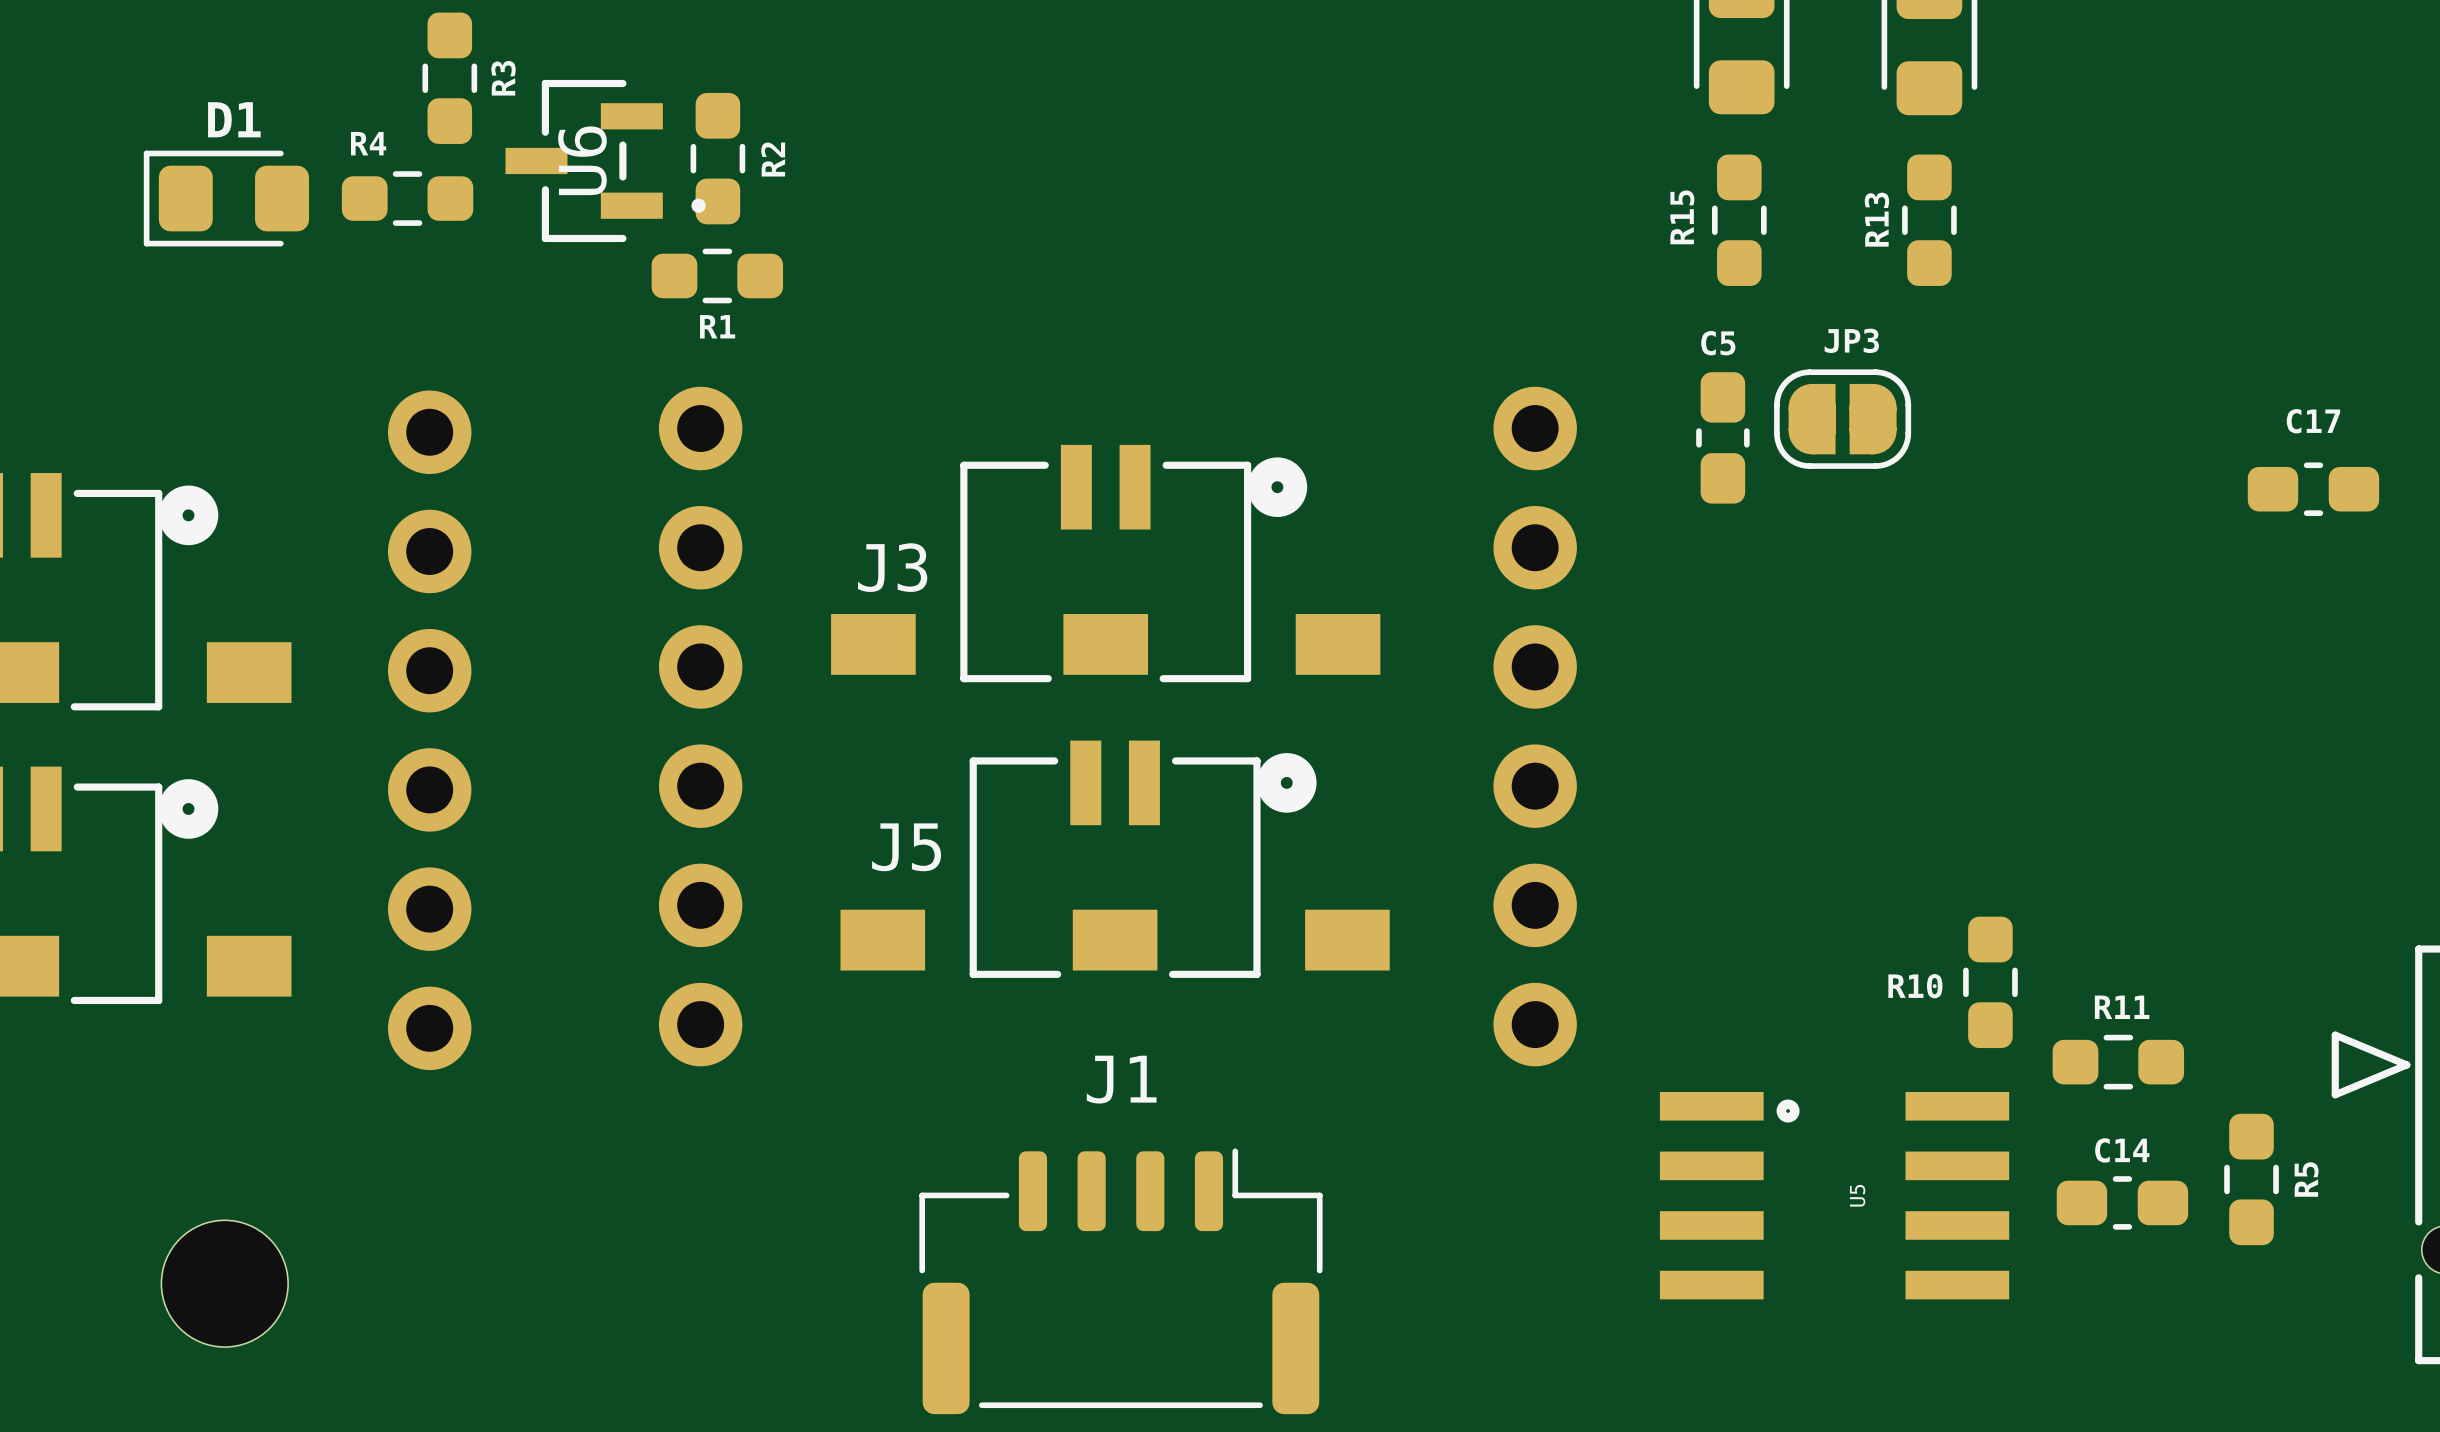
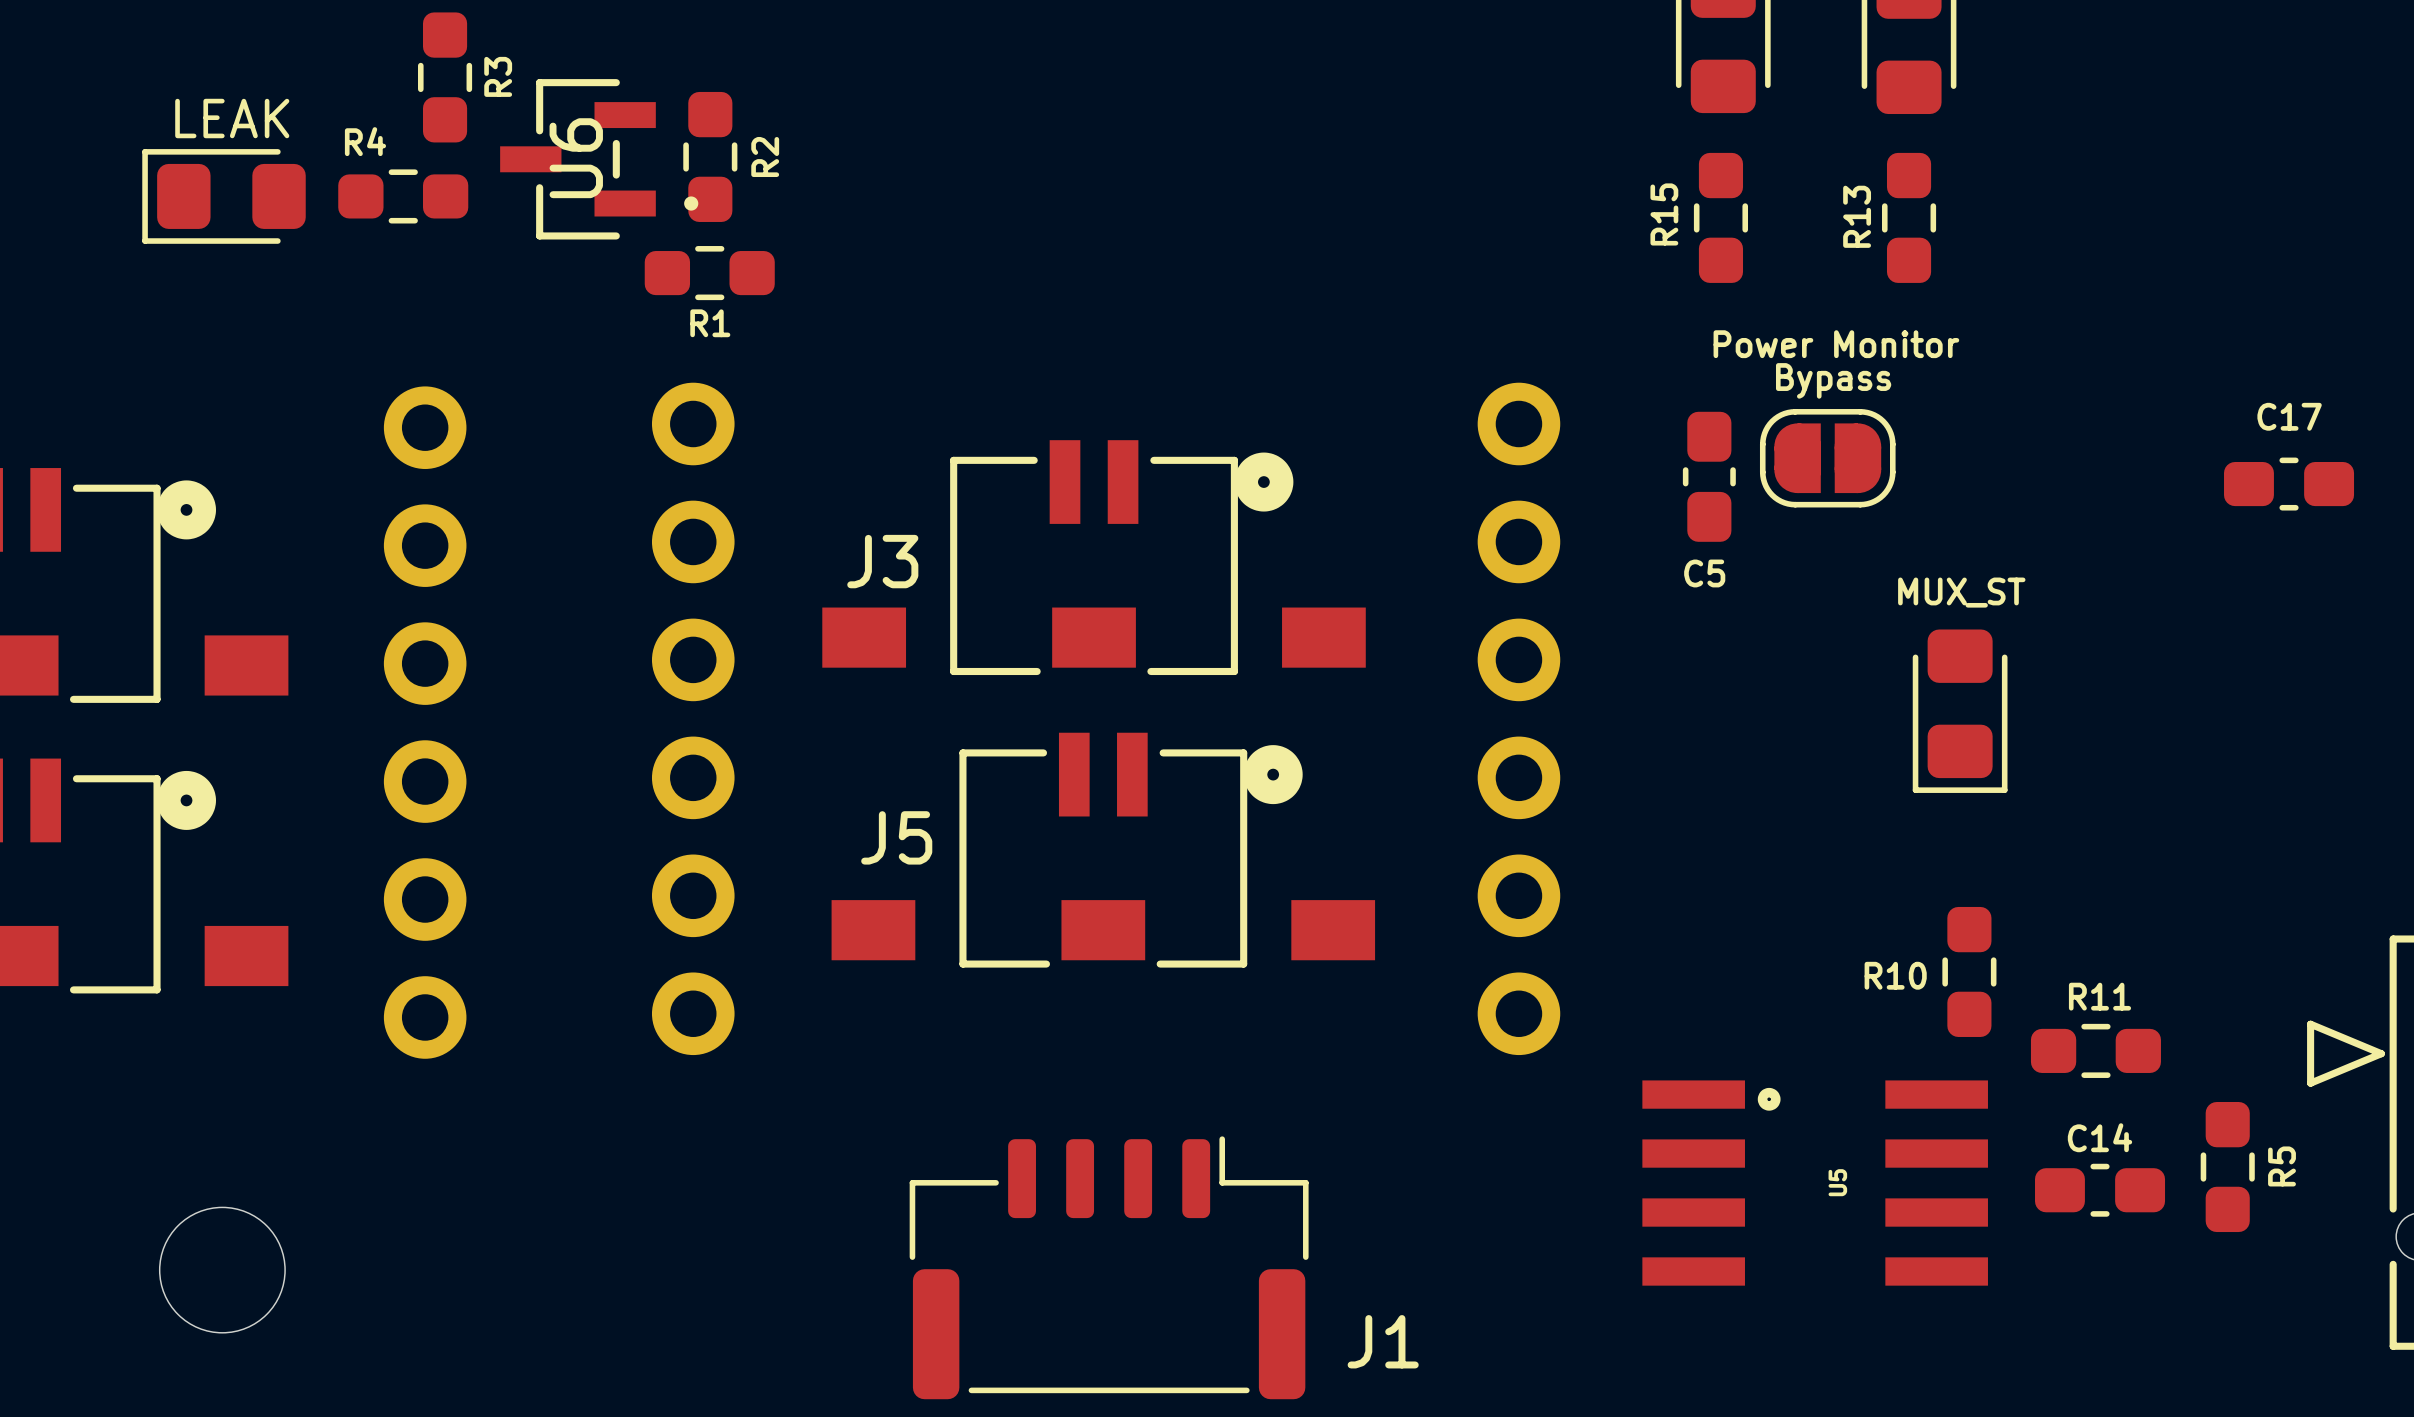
D1 name: D1 (234, 119) -> LEAK (232, 118)
JP3 name: JP3 (1851, 340) -> Power Monitor (1836, 344)
C5 name position: C5 (1718, 343) -> C5 (1704, 573)
text: none -> Bypass (1833, 380)
JP3 position: (1842, 419) -> (1827, 458)
C5 position: (1722, 437) -> (1709, 476)
MUX_ST: none -> (1960, 711)
J1 name position: J1 (1121, 1079) -> J1 (1383, 1341)

